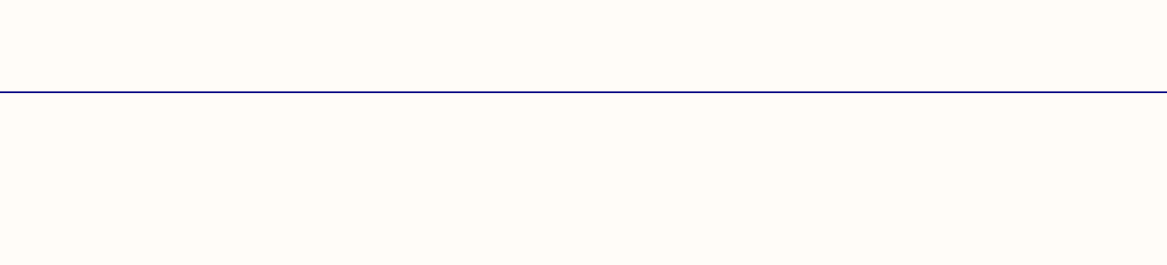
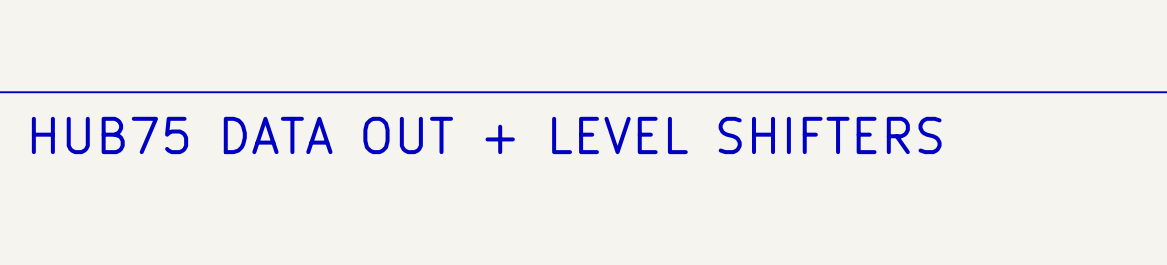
text: none -> HUB75 DATA OUT + LEVEL SHIFTERS (486, 135)

